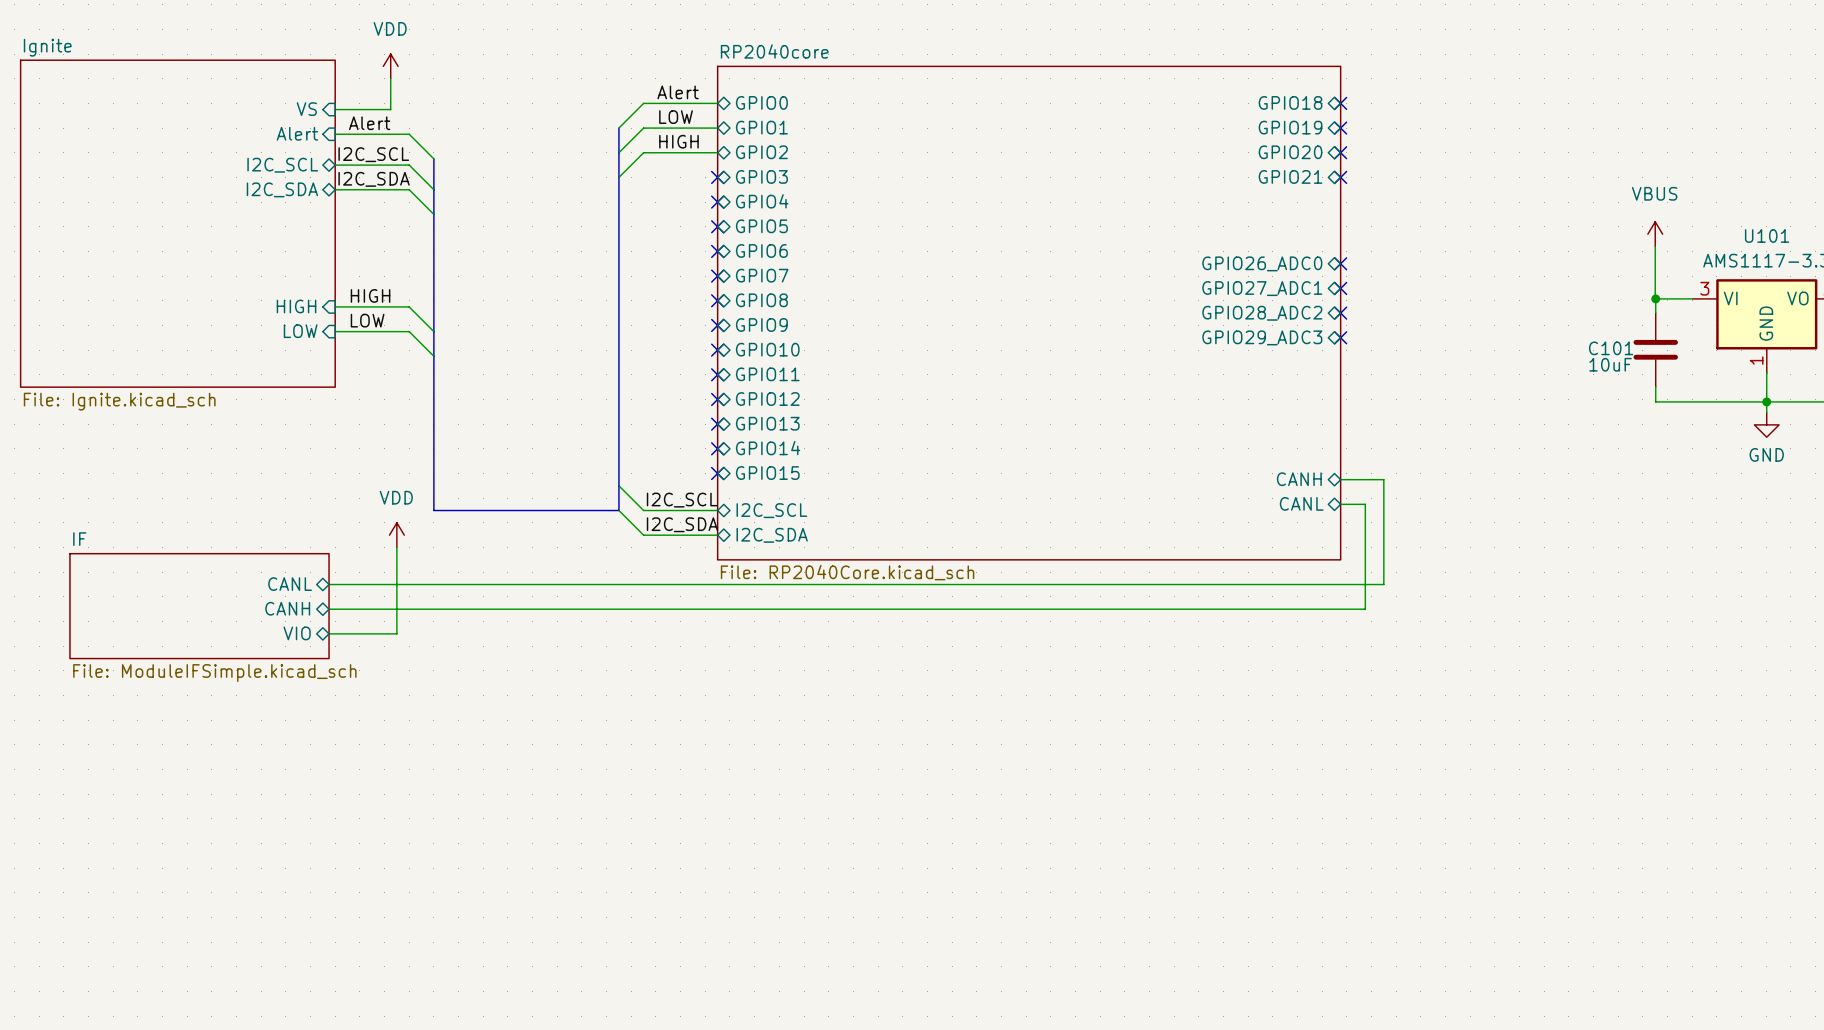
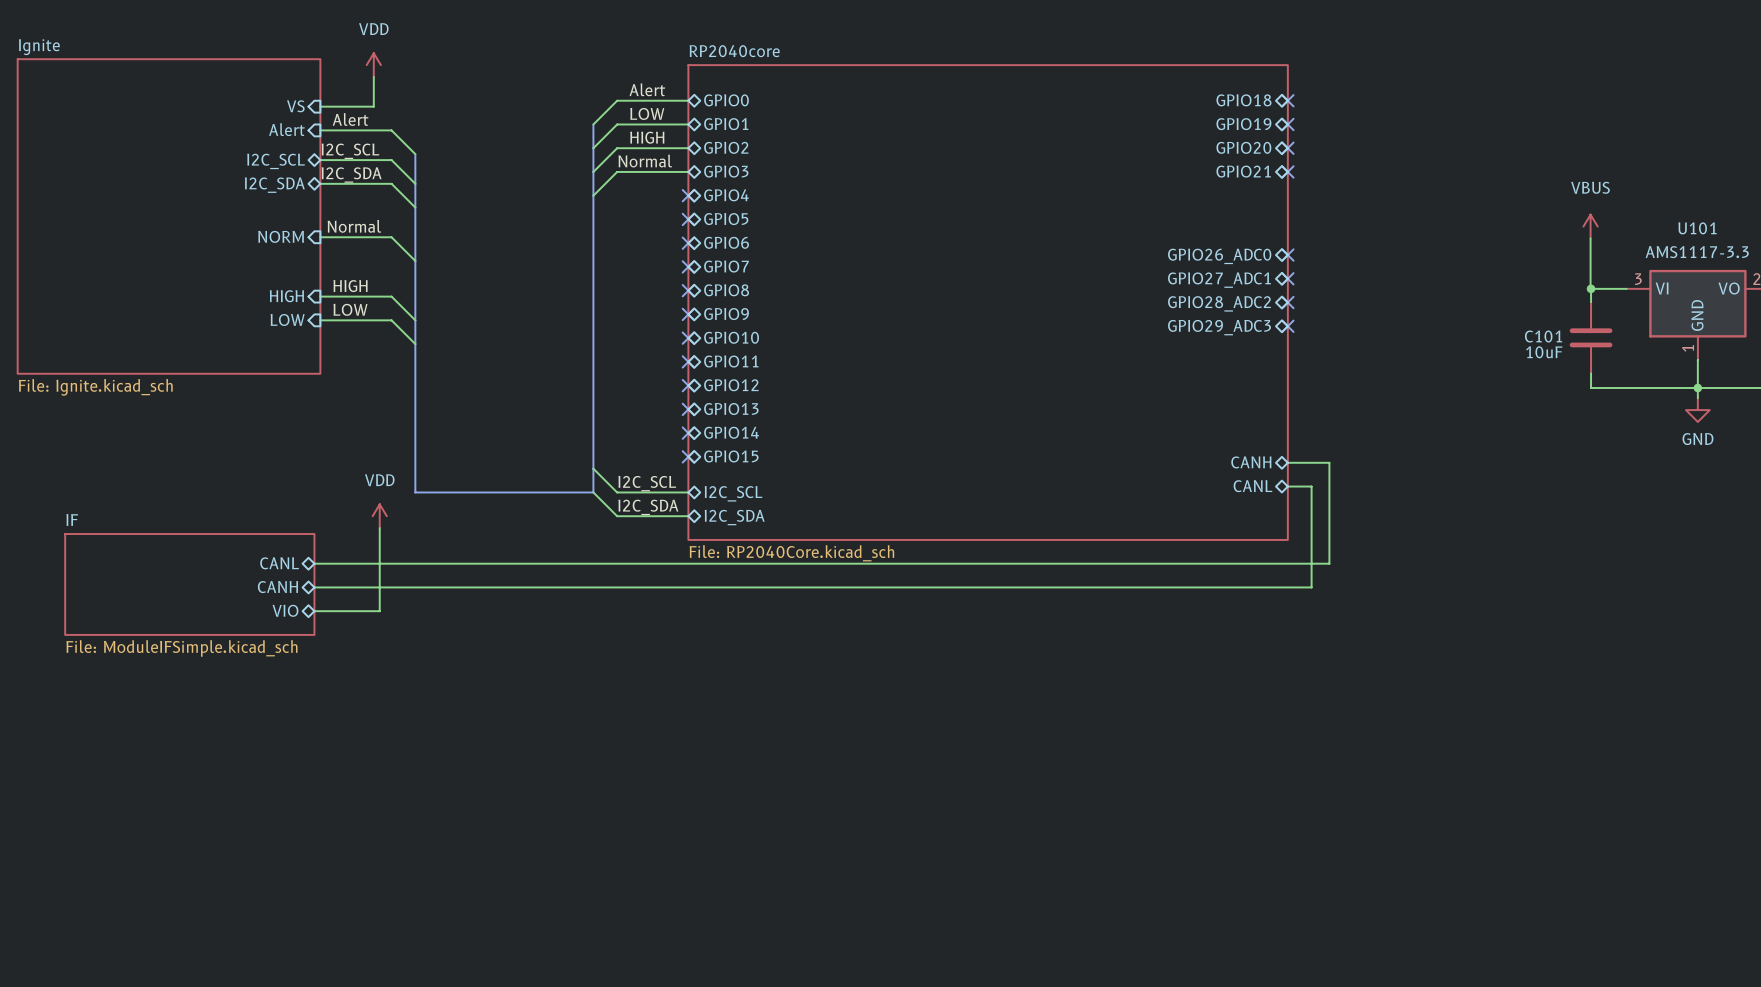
label: none -> Normal (645, 161)
wire: none -> (688, 171) (617, 171) (593, 195)
no-connect mark: (717, 177) -> none
label: none -> Normal (354, 226)
sheet pin: none -> NORM (281, 236)
wire: none -> (320, 237) (391, 237) (415, 260)

